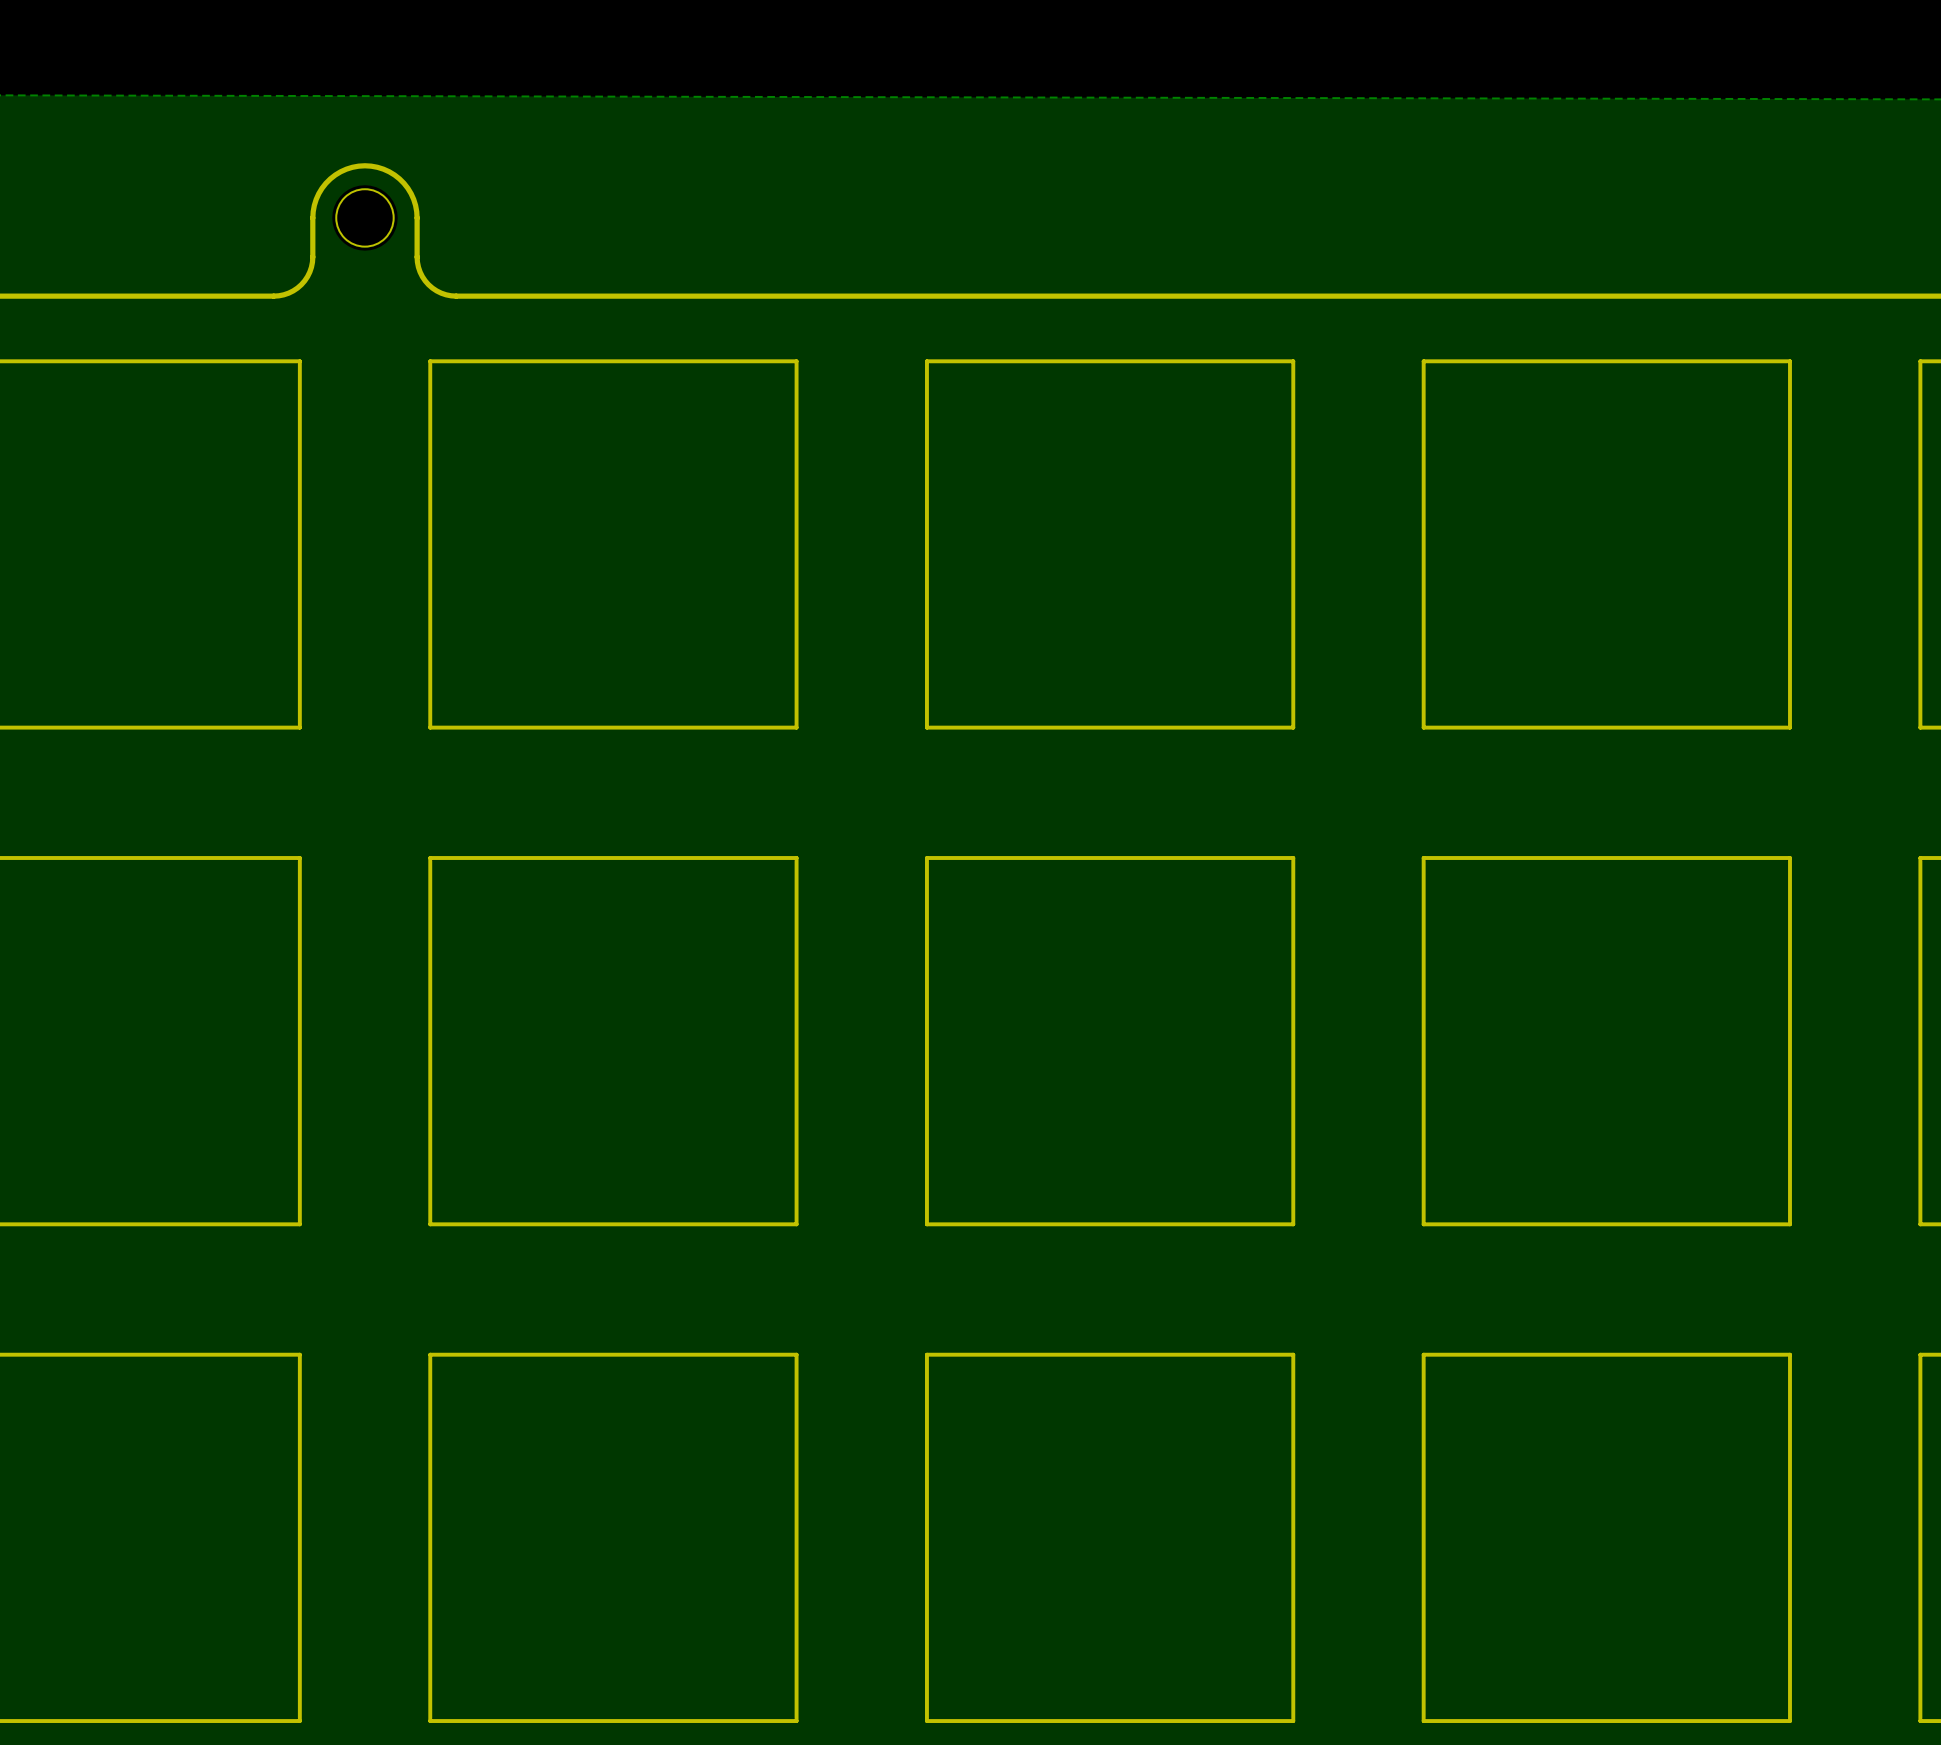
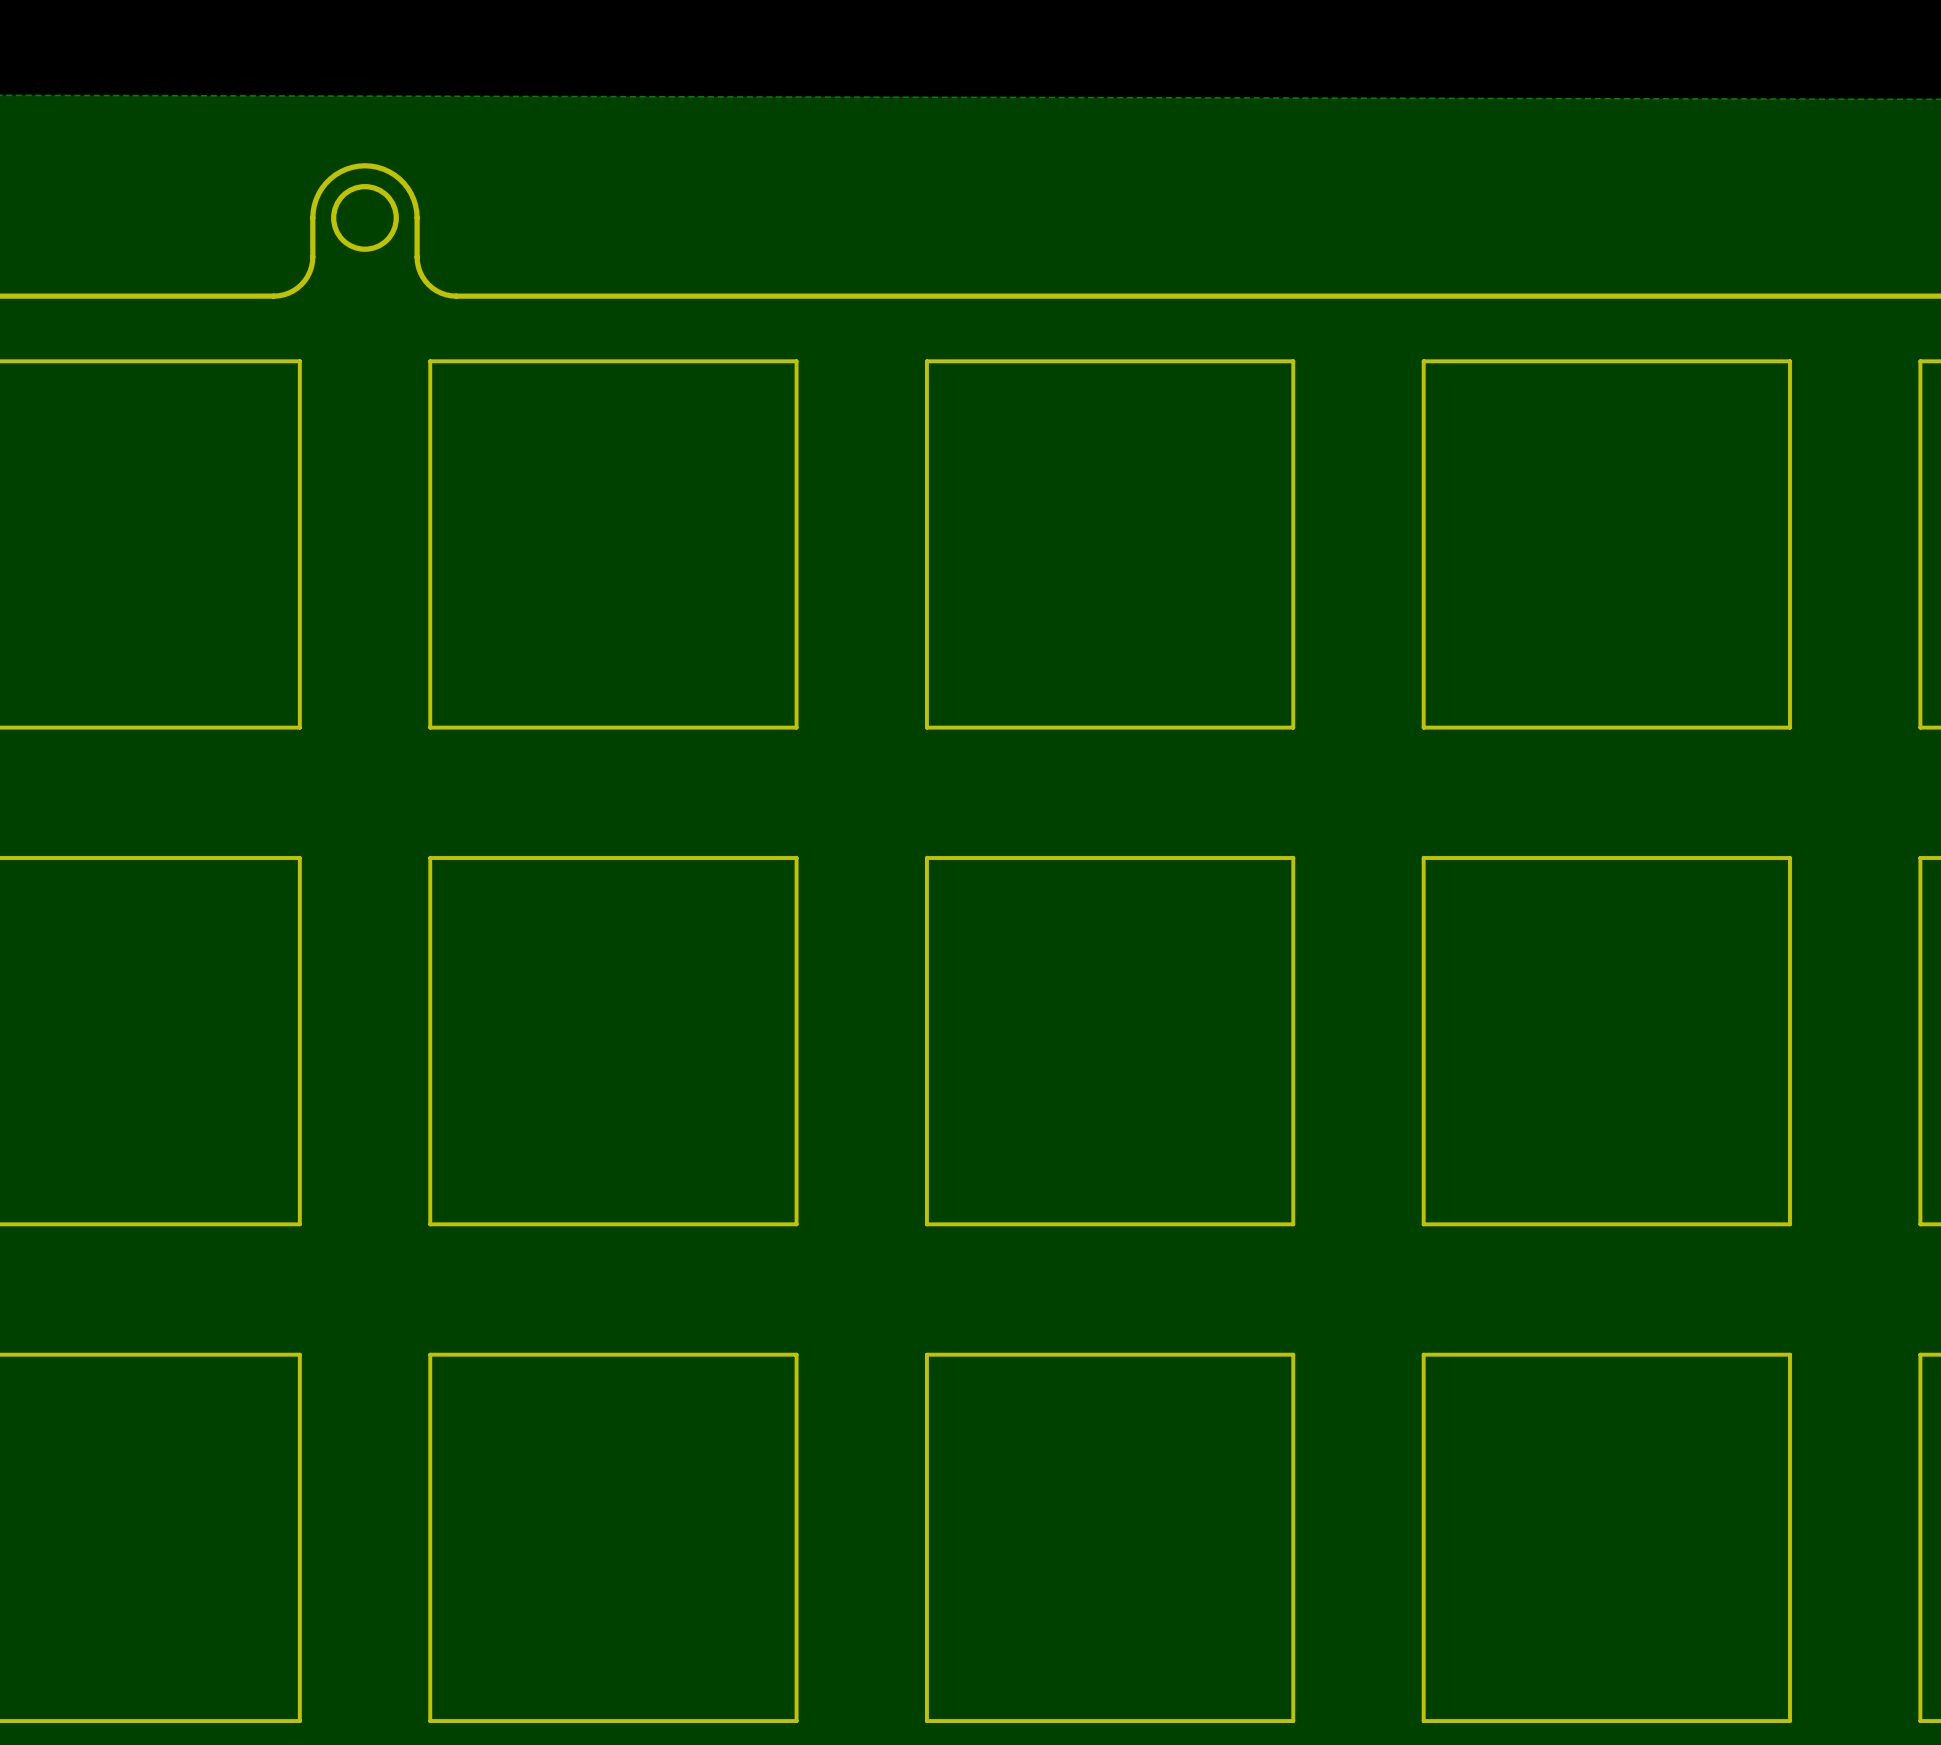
round board edge: none -> [331, 184, 399, 252]
part: (364, 217) -> none

